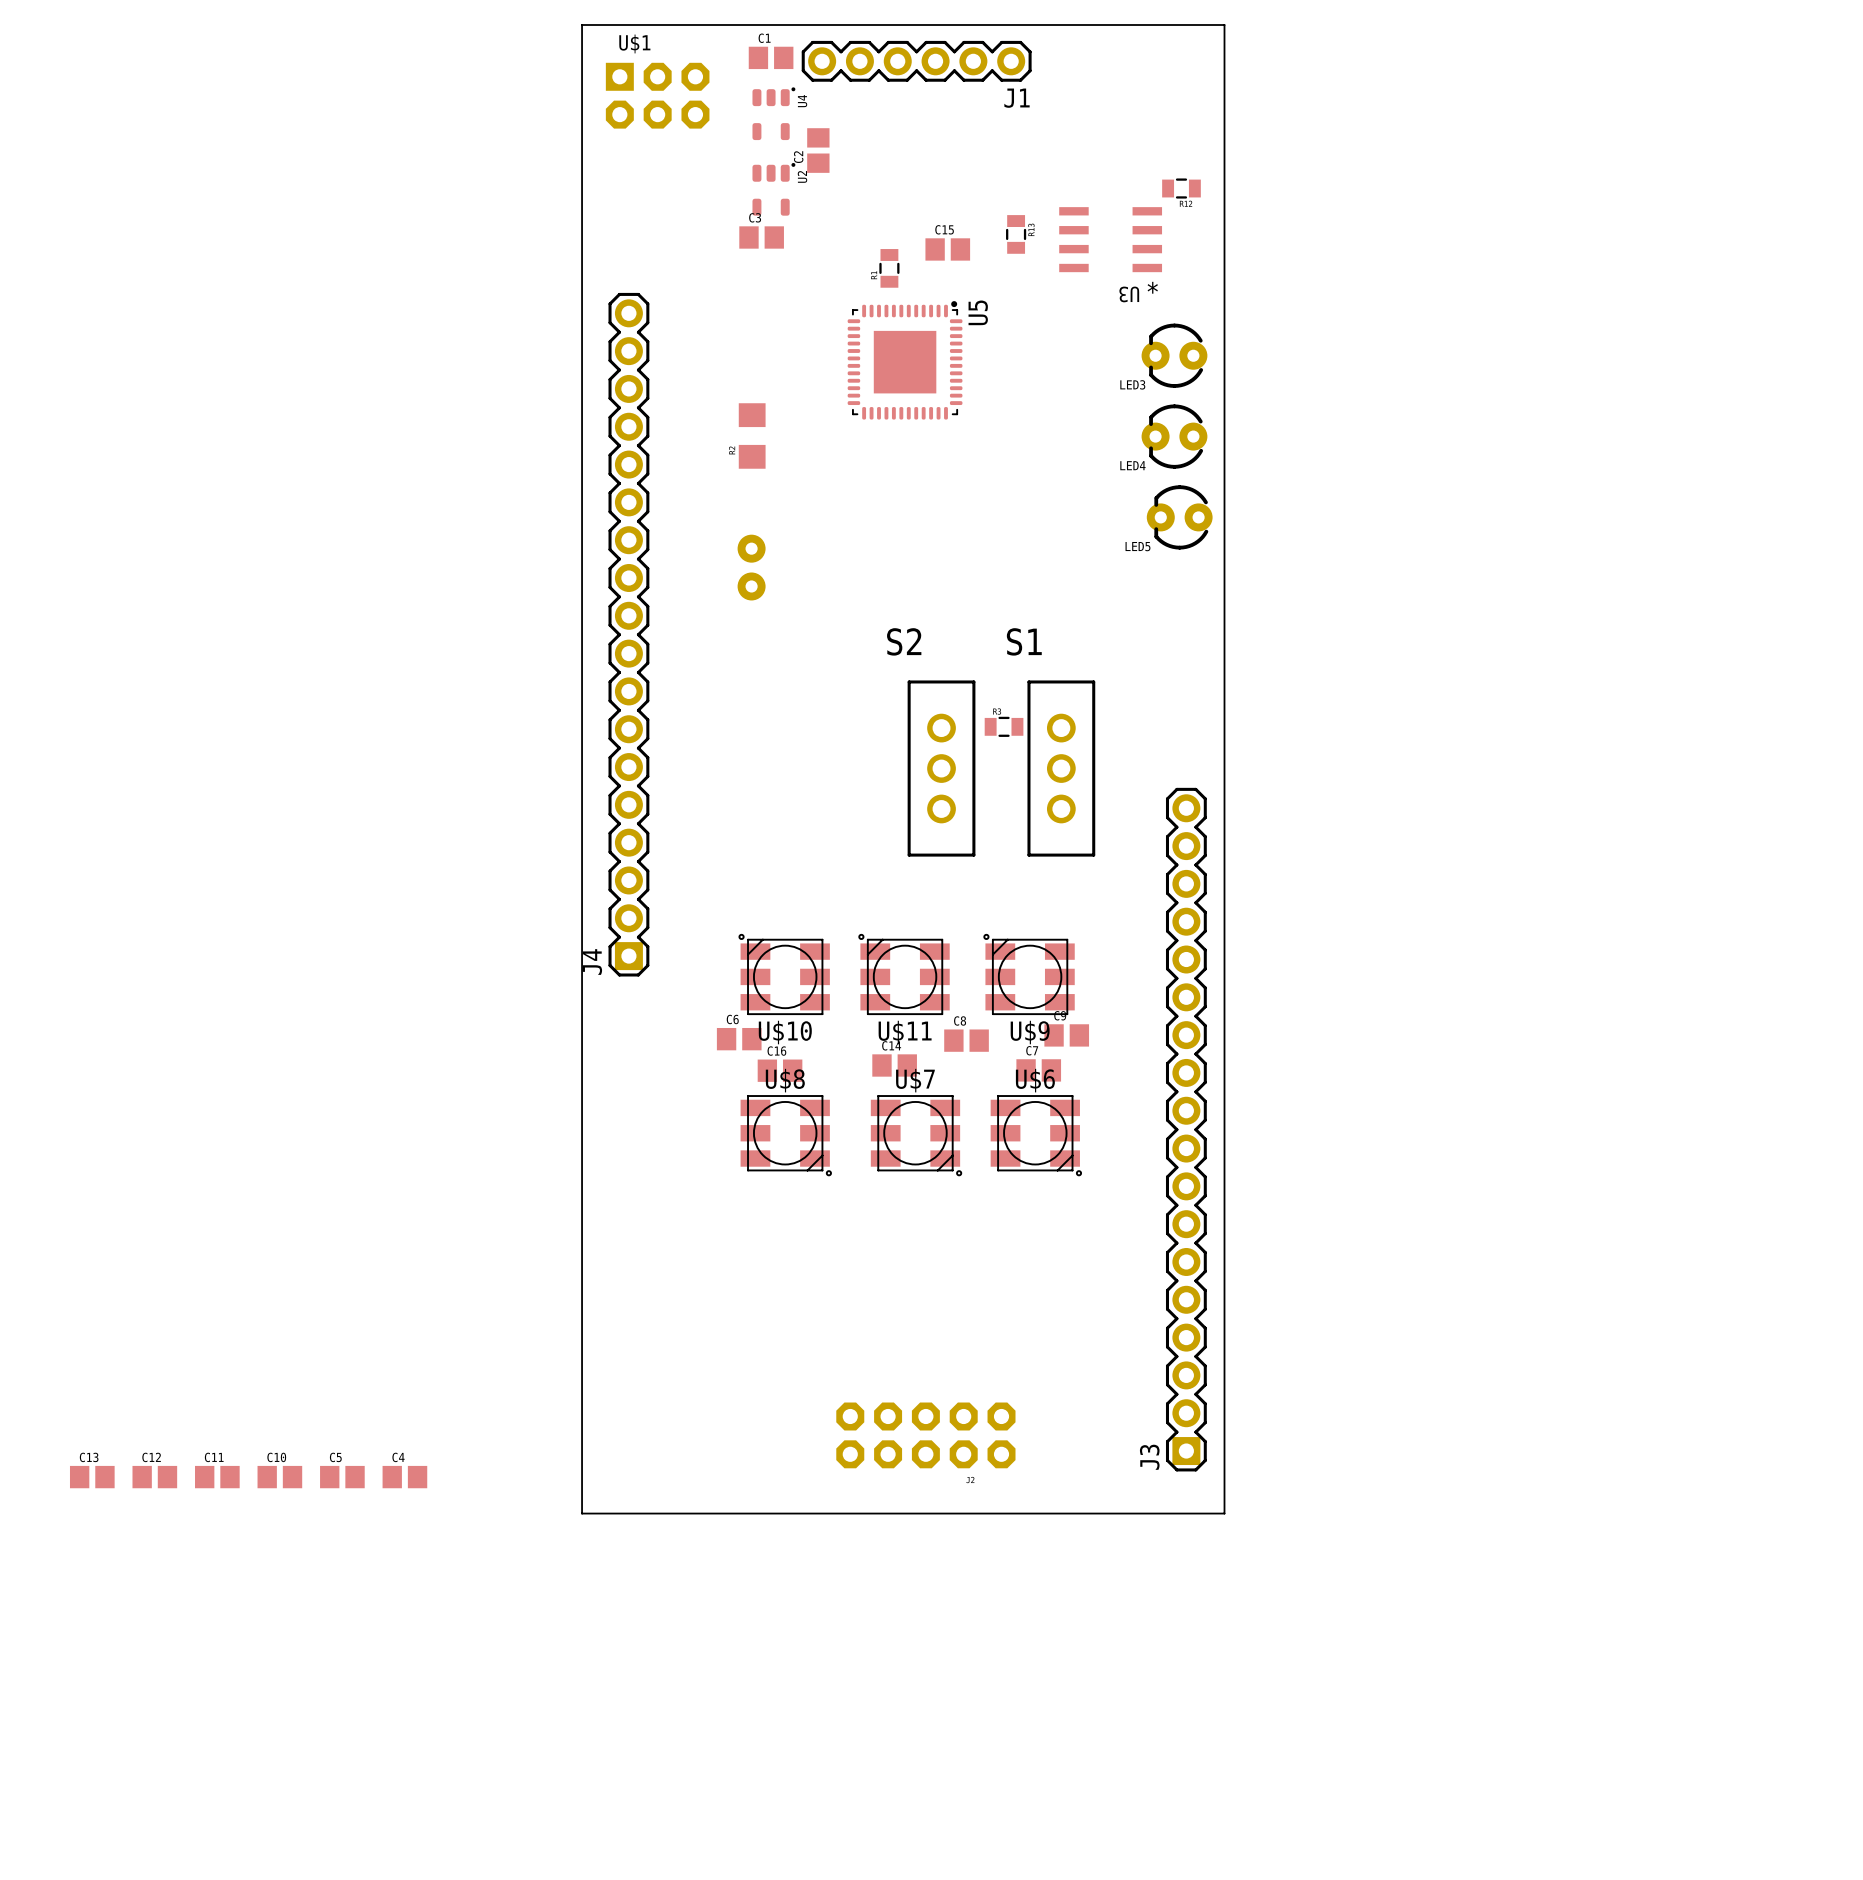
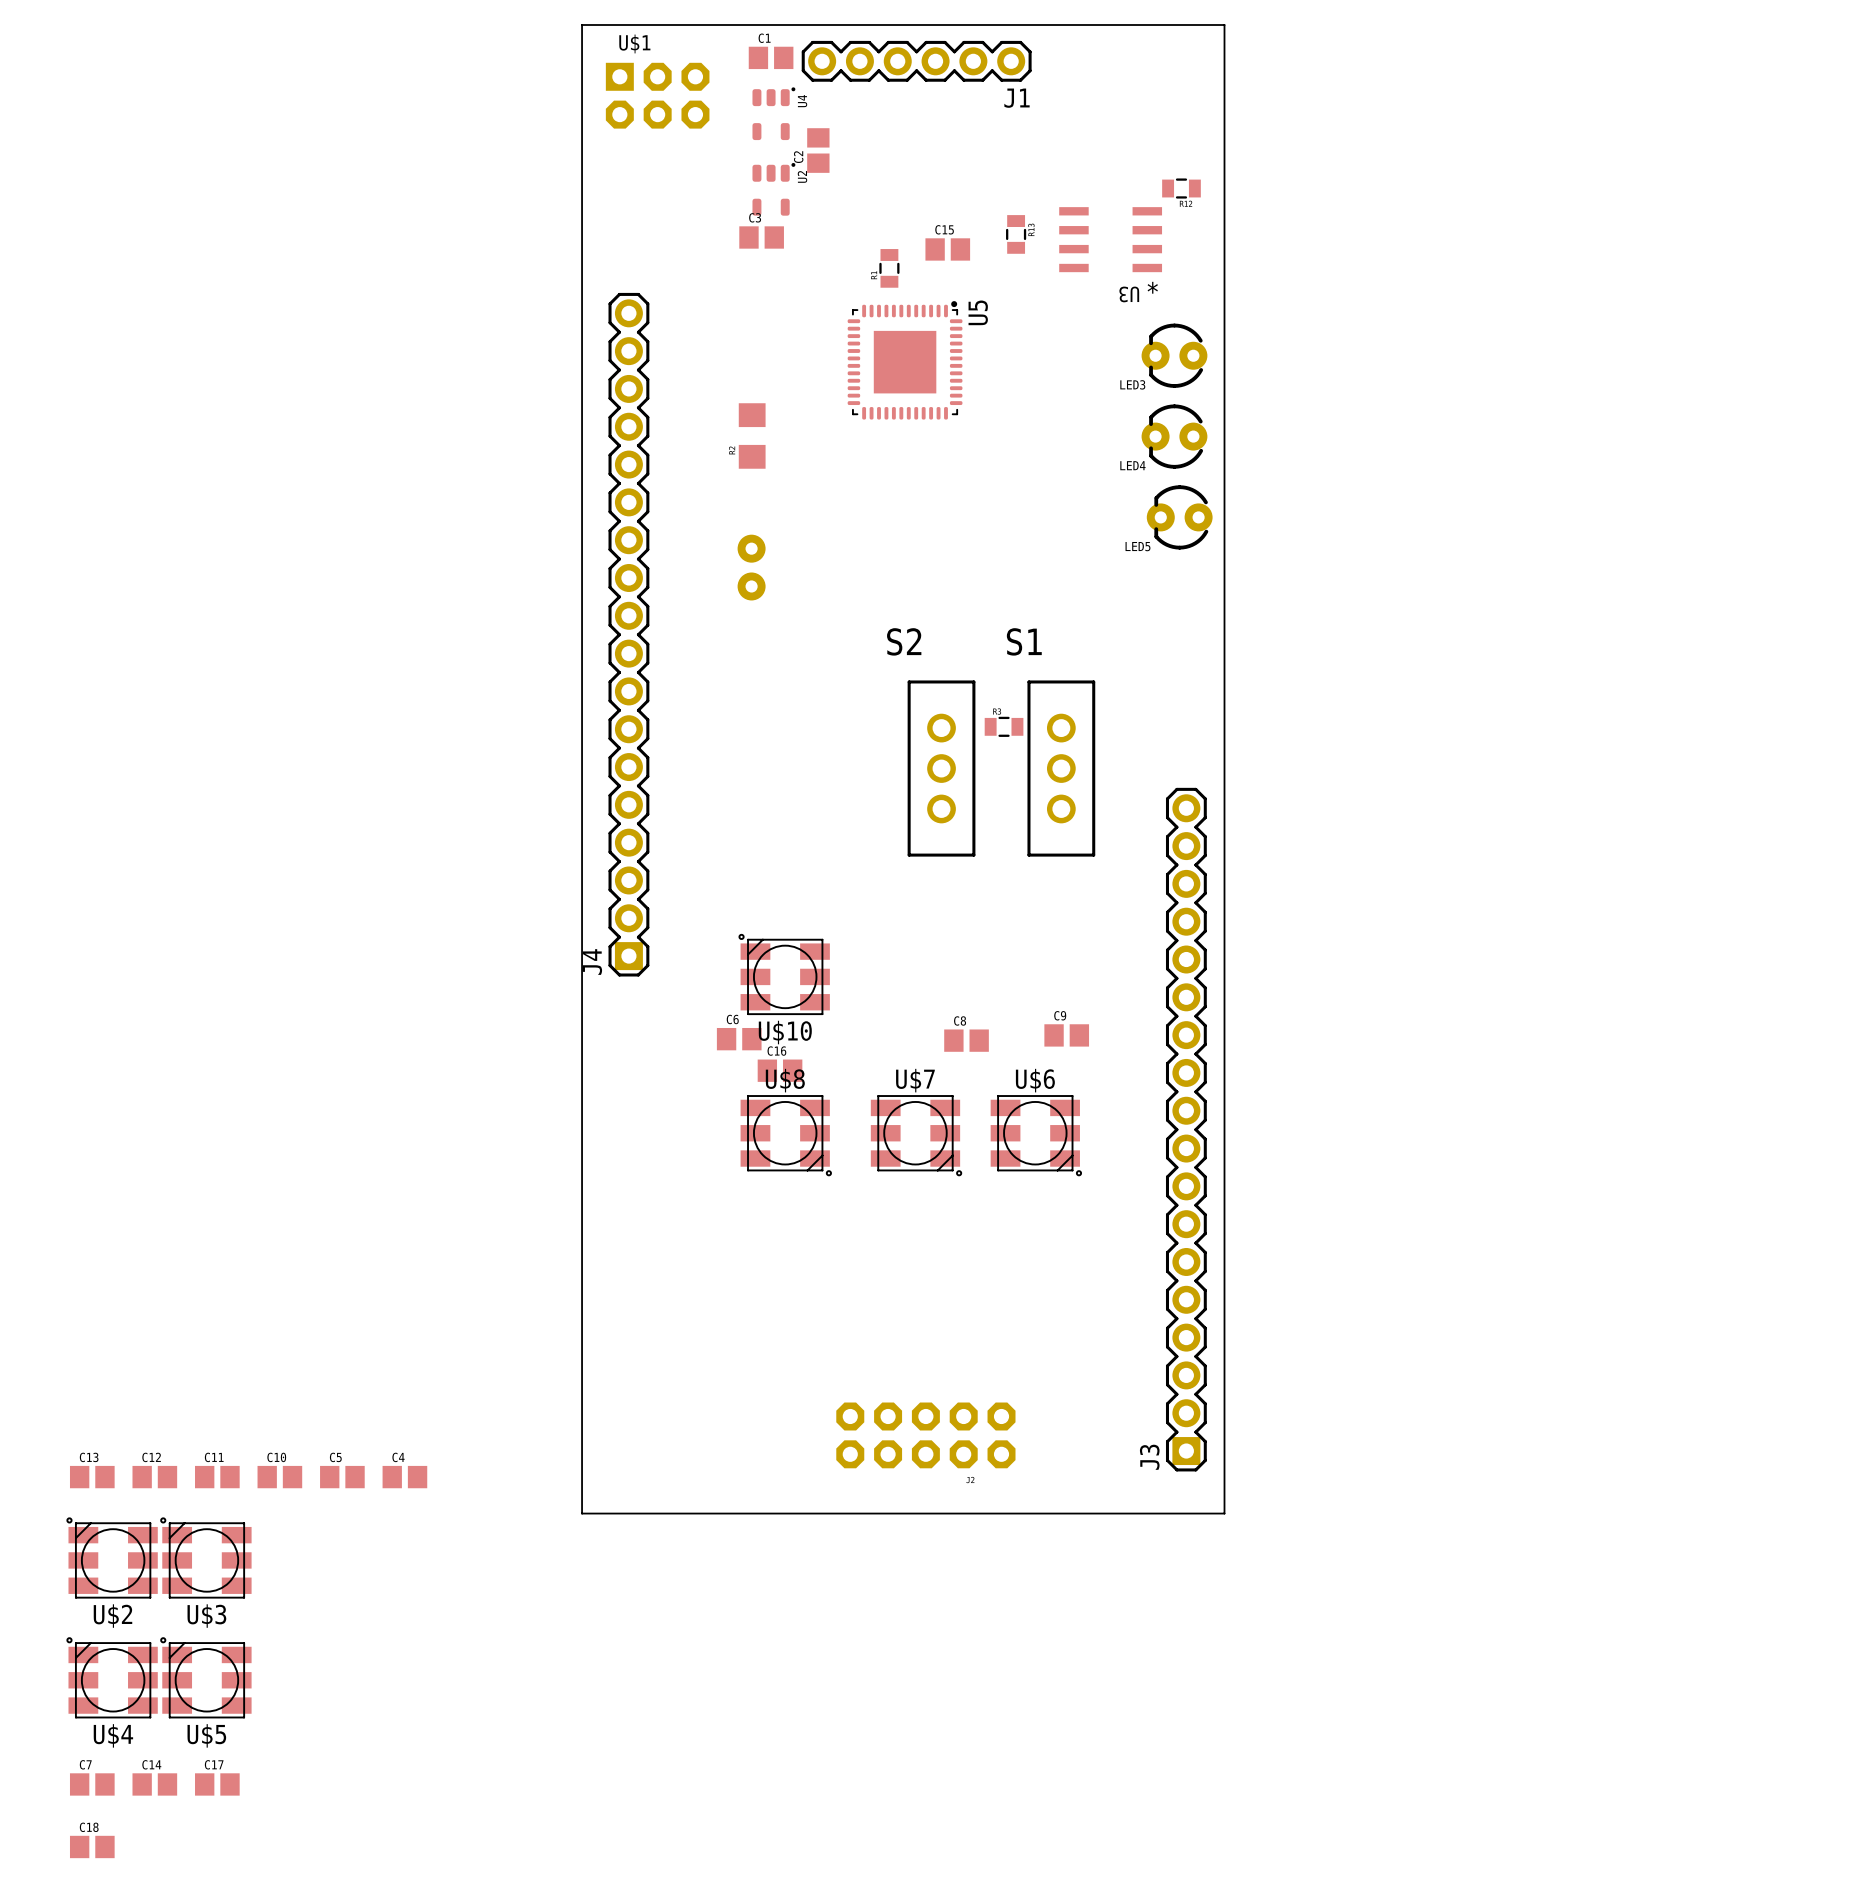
U$11: (904, 974) -> none
U$9: (1029, 974) -> none
C14 position: (894, 1065) -> (154, 1784)
C7 position: (1038, 1070) -> (92, 1784)
U$2: none -> (112, 1557)
U$3: none -> (205, 1557)
U$4: none -> (112, 1677)
U$5: none -> (205, 1677)
C17: none -> (217, 1784)
C18: none -> (92, 1846)

